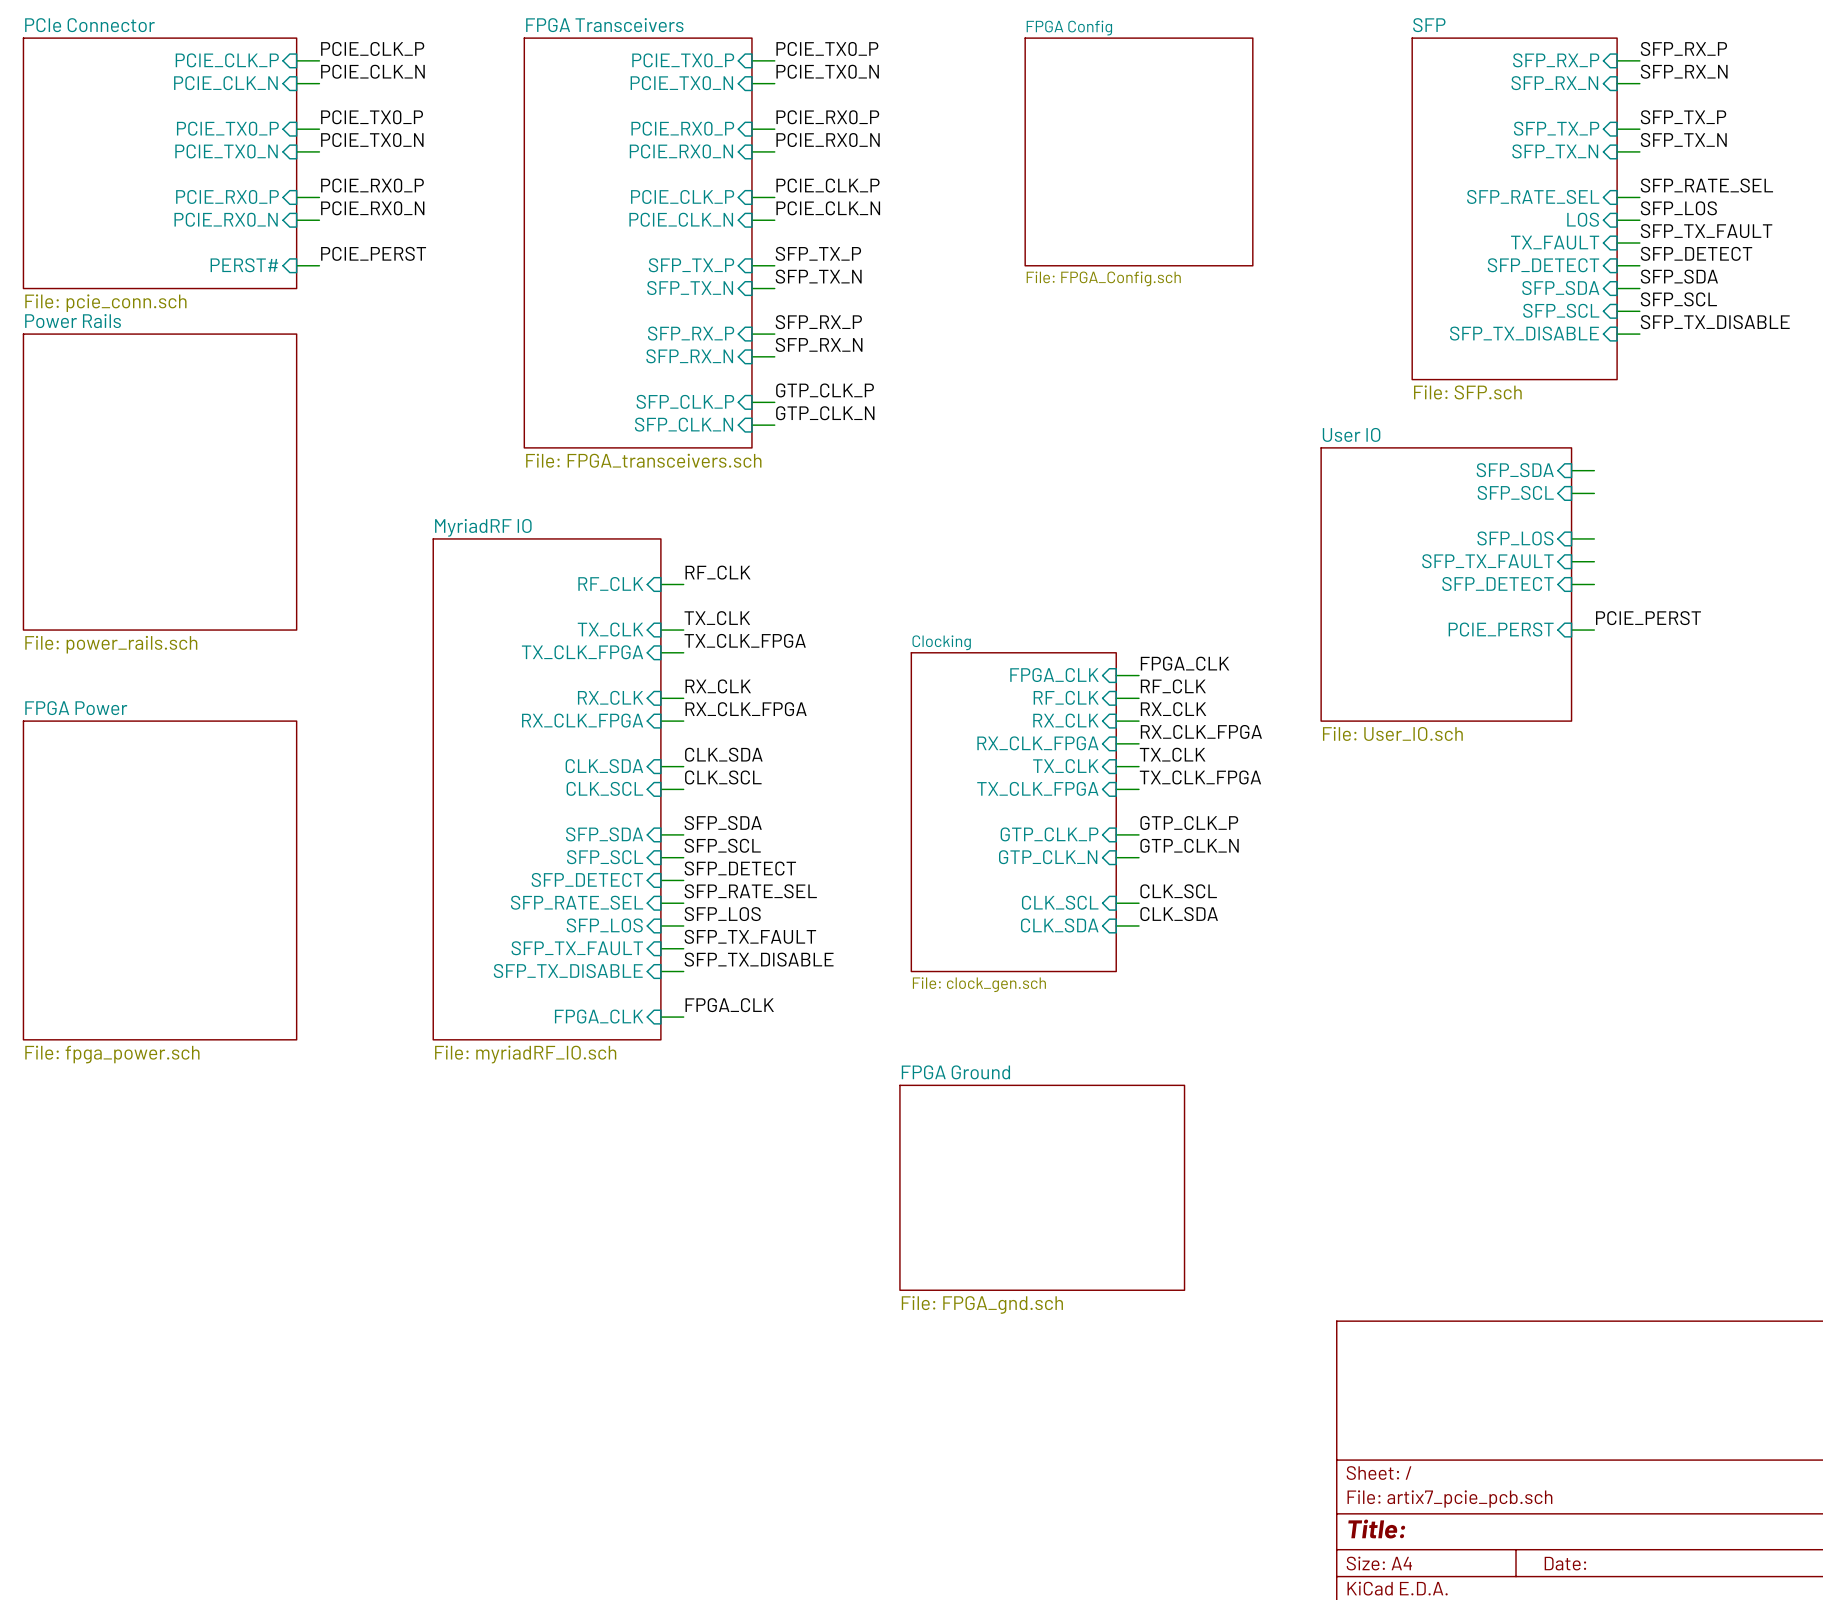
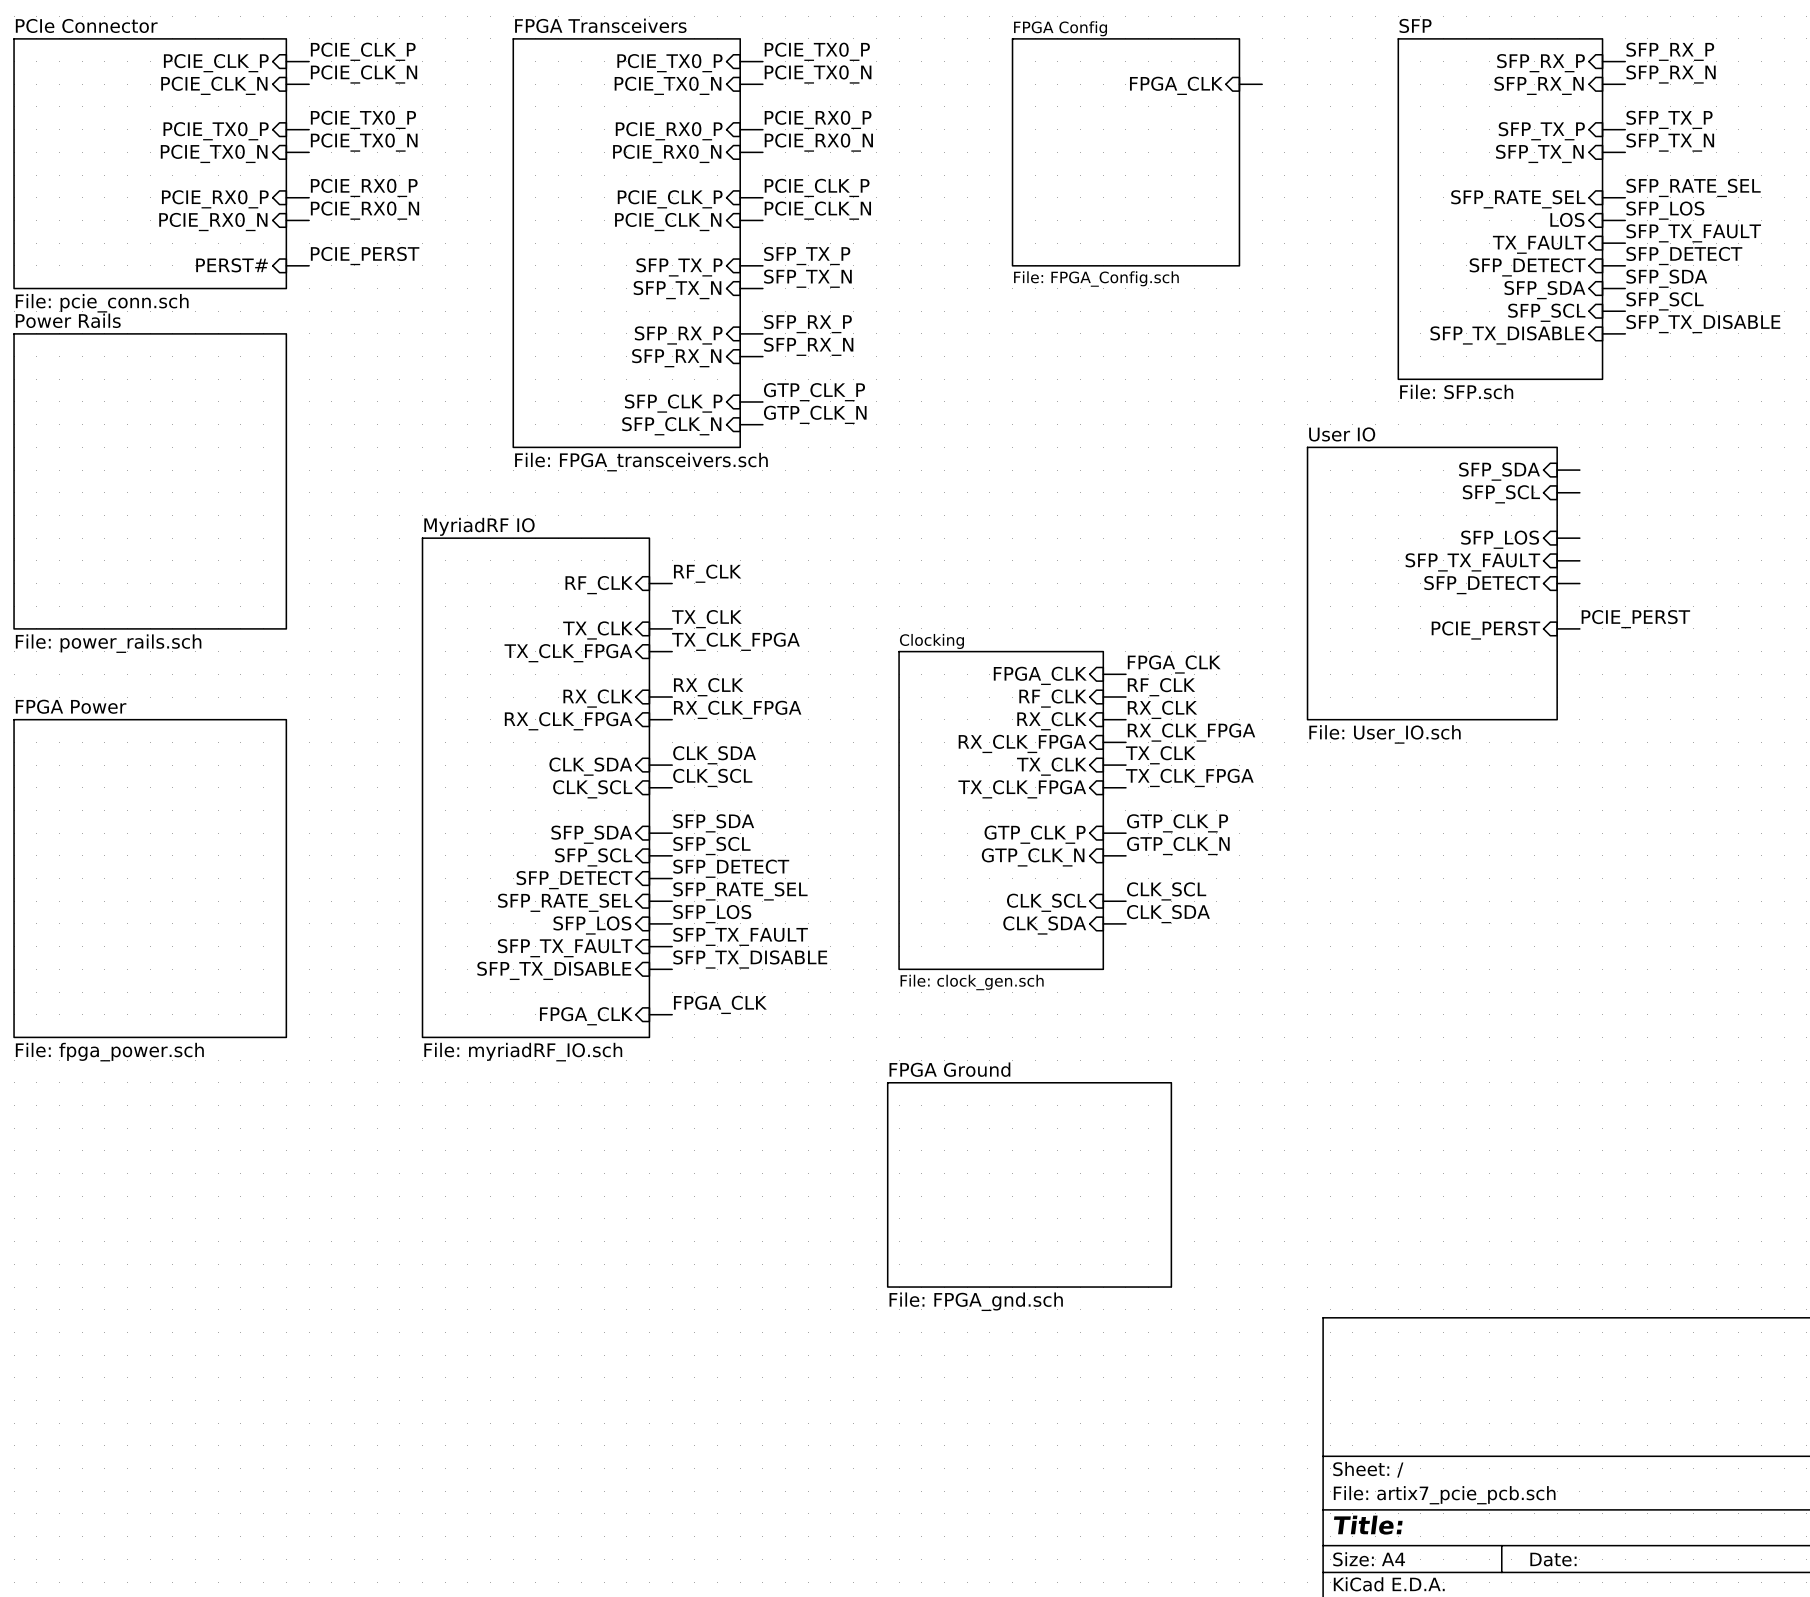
sheet pin: none -> FPGA_CLK (1176, 85)
wire: none -> (1239, 84) (1262, 84)

